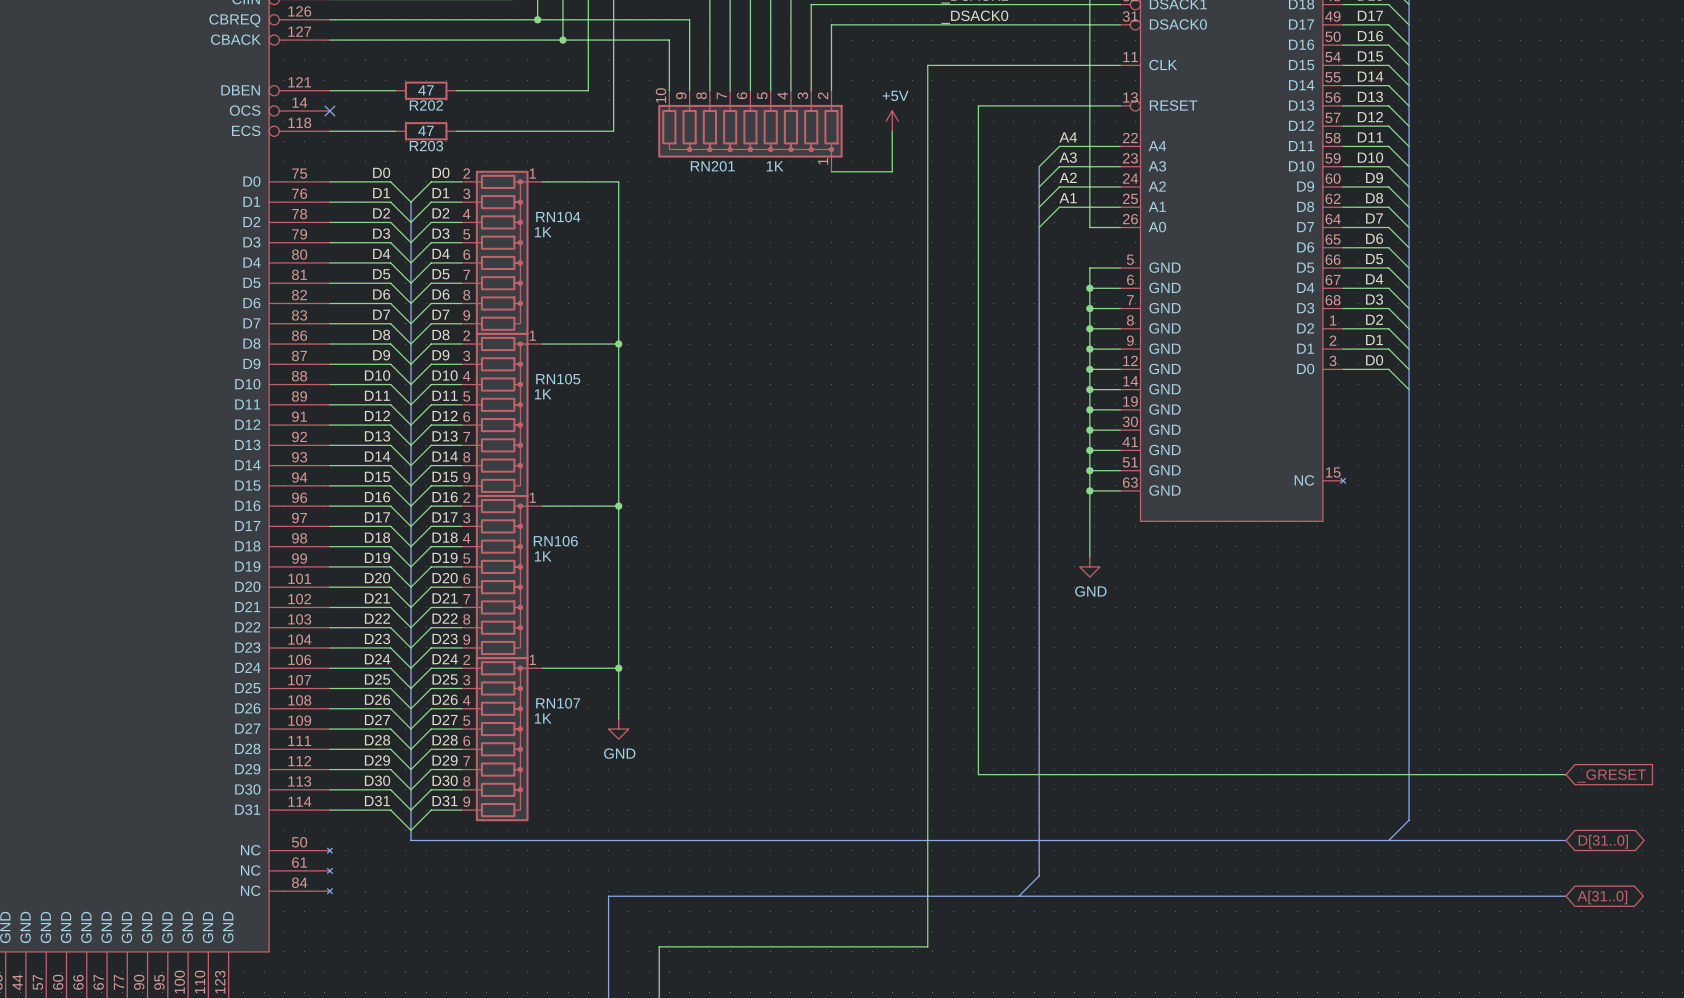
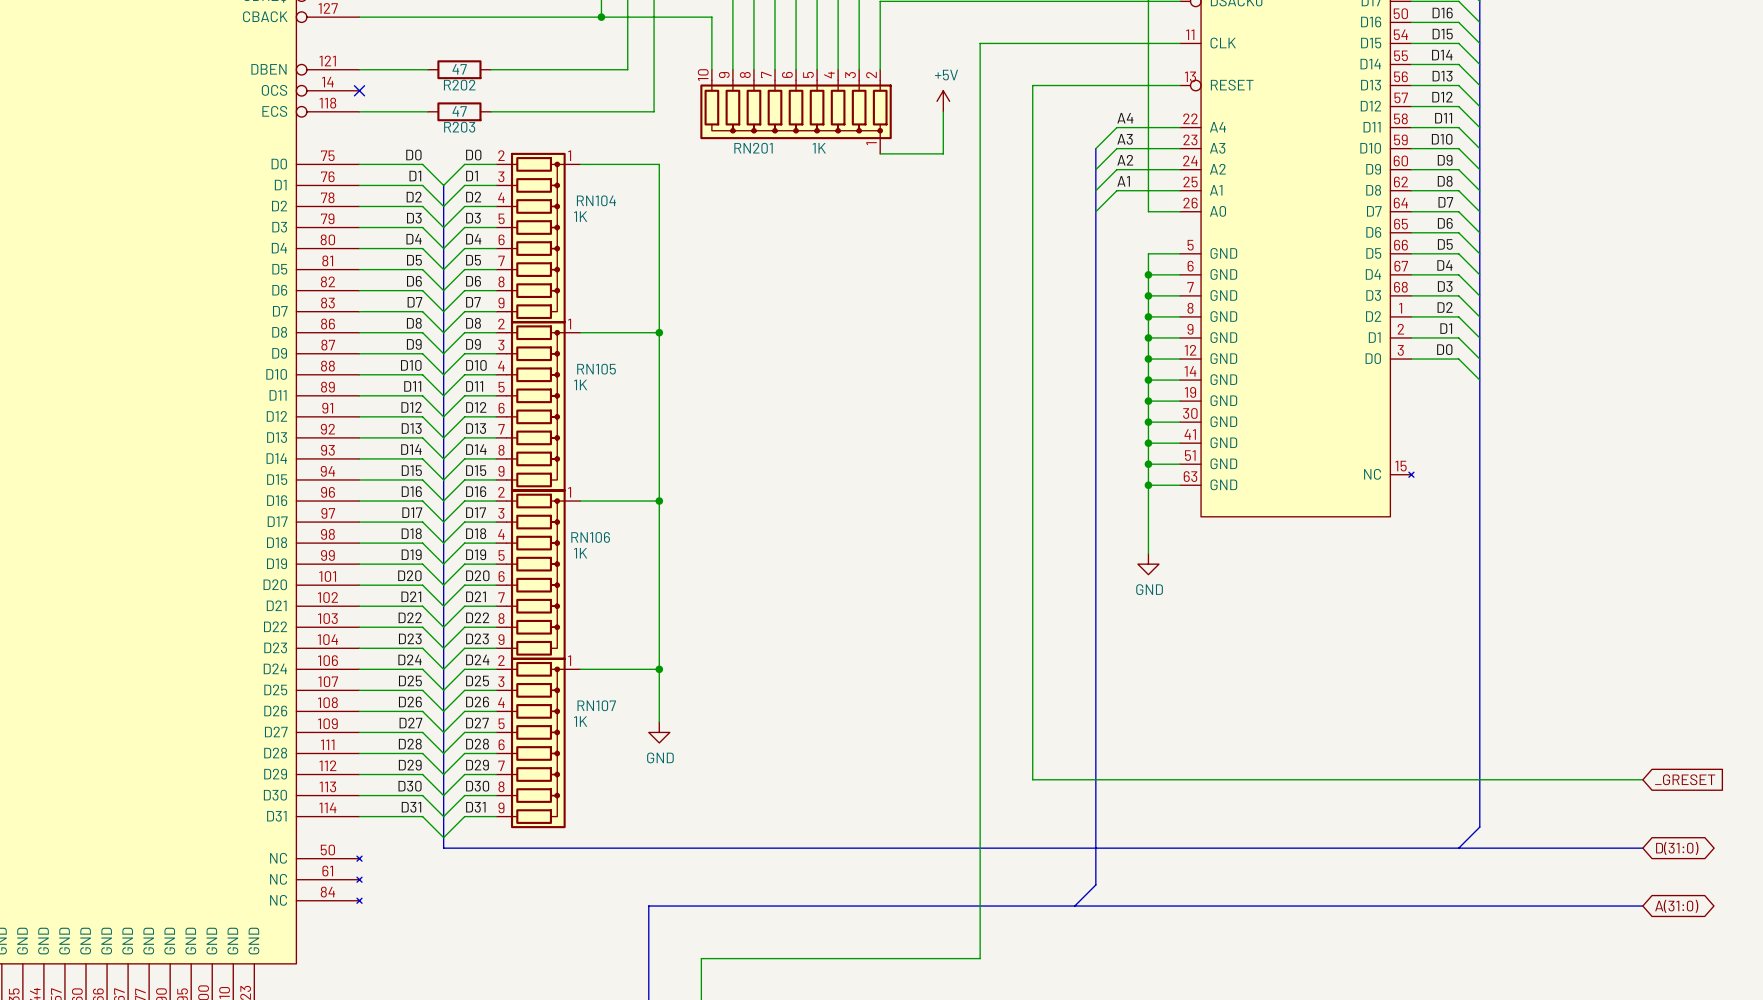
global label: D[31..0] (1603, 841) -> D(31:0) (1677, 848)
global label: A[31..0] (1602, 897) -> A(31:0) (1676, 906)

